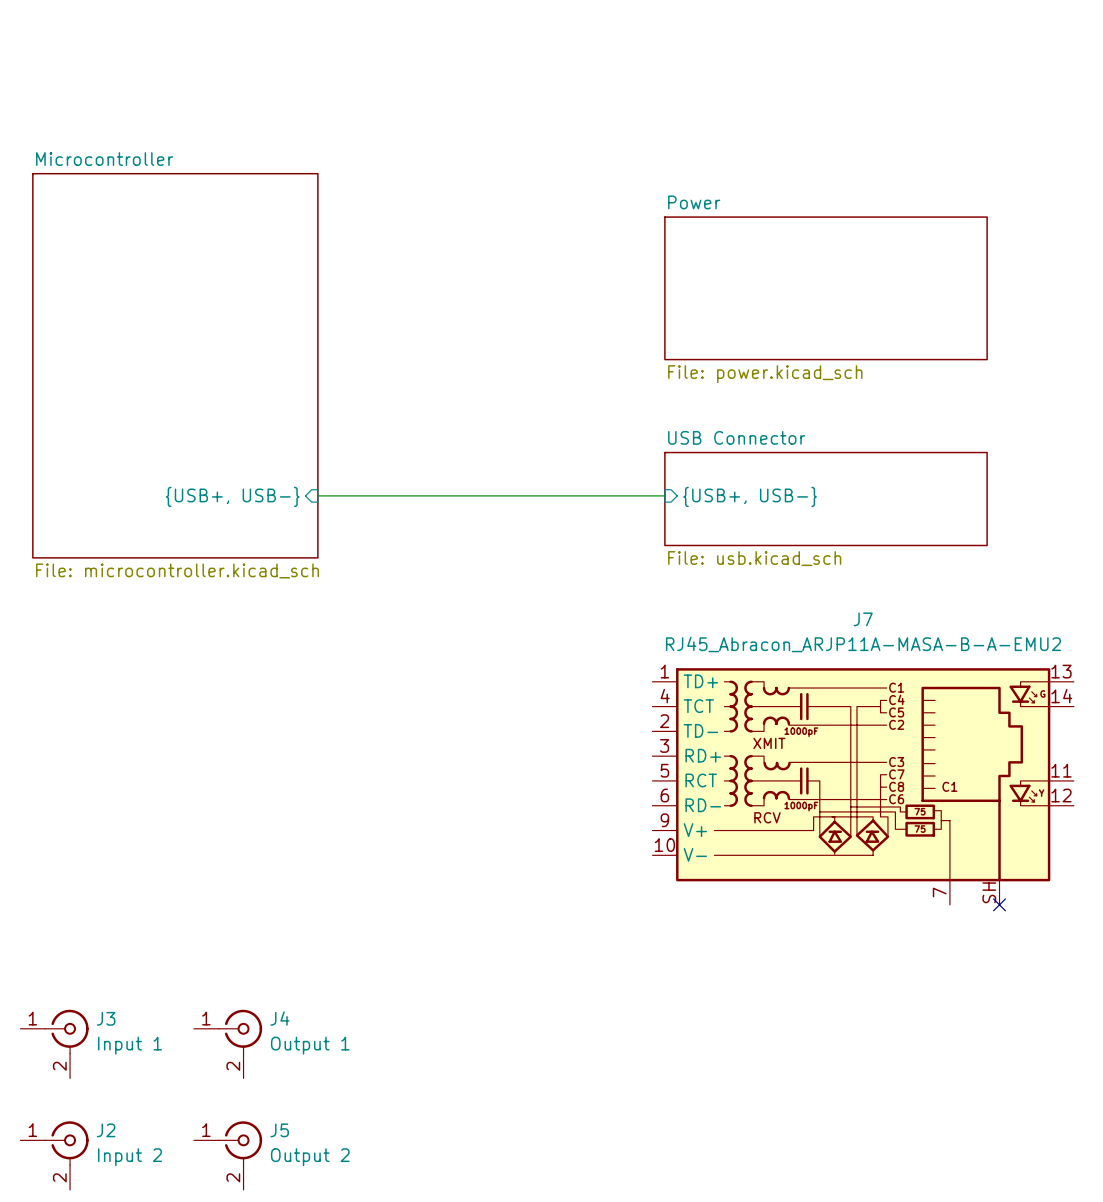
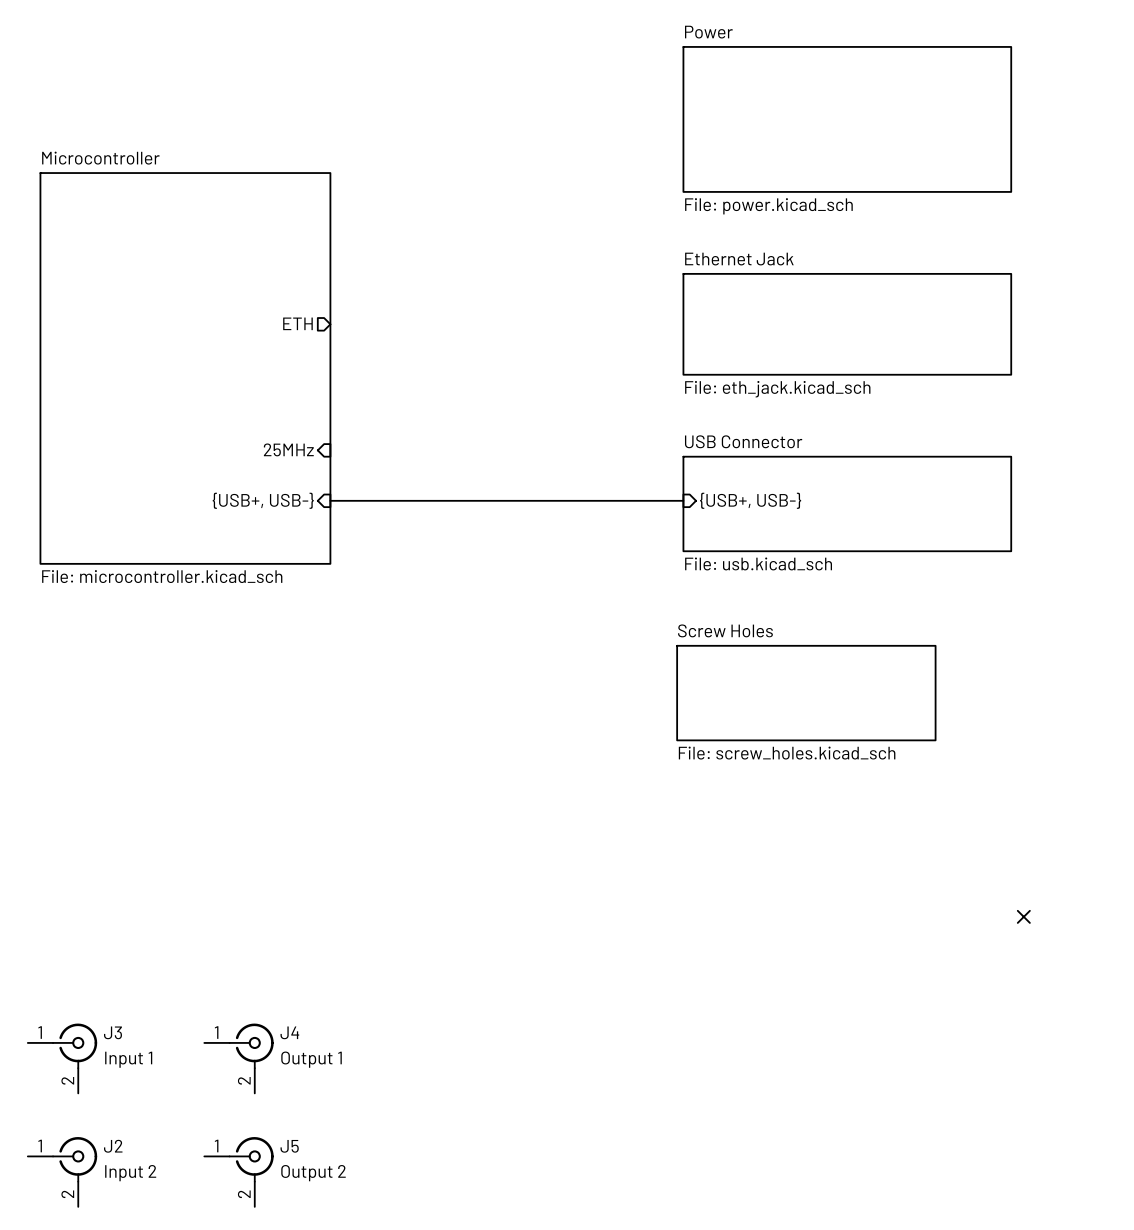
sheet Power position: (826, 288) -> (847, 119)
sheet pin: none -> ETH (297, 323)
sheet Ethernet Jack: none -> File: eth_jack.kicad_sch (847, 324)
sheet pin: none -> 25MHz (288, 449)
sheet Screw Holes: none -> File: screw_holes.kicad_sch (806, 693)
J7: RJ45_Abracon_ARJP11A-MASA-B-A-EMU2 (863, 786) -> none

